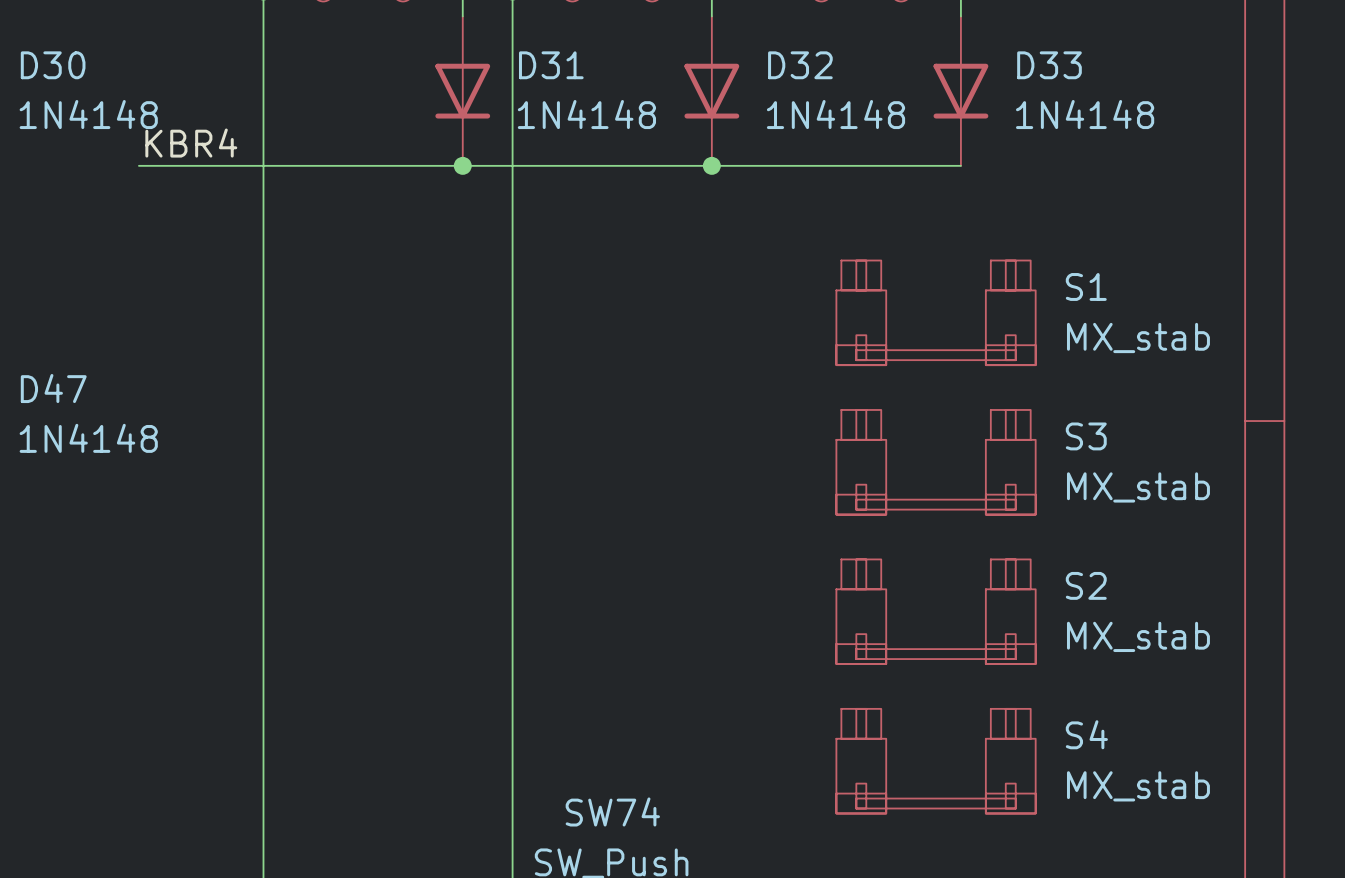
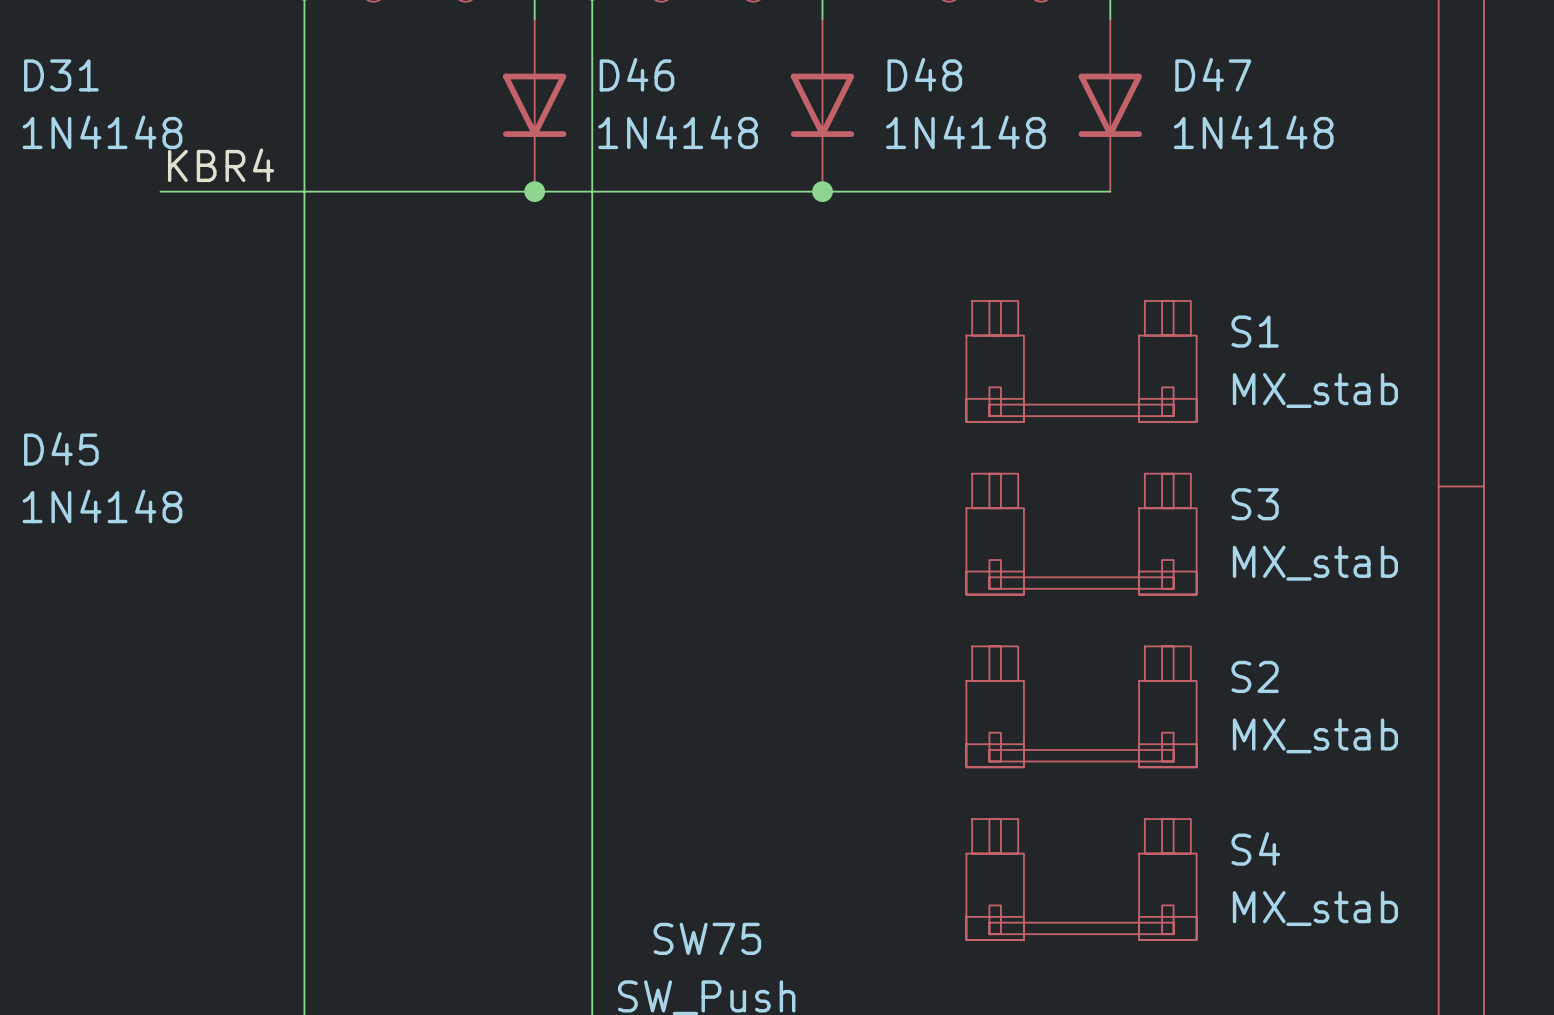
D30 name: D30 (53, 65) -> D31 (61, 75)
D31 name: D31 (551, 65) -> D46 (637, 74)
D32 name: D32 (800, 65) -> D48 (924, 74)
D33 name: D33 (1049, 65) -> D47 (1213, 74)
D47 name: D47 (53, 388) -> D45 (61, 448)
SW74 name: SW74 (612, 811) -> SW75 (707, 938)

